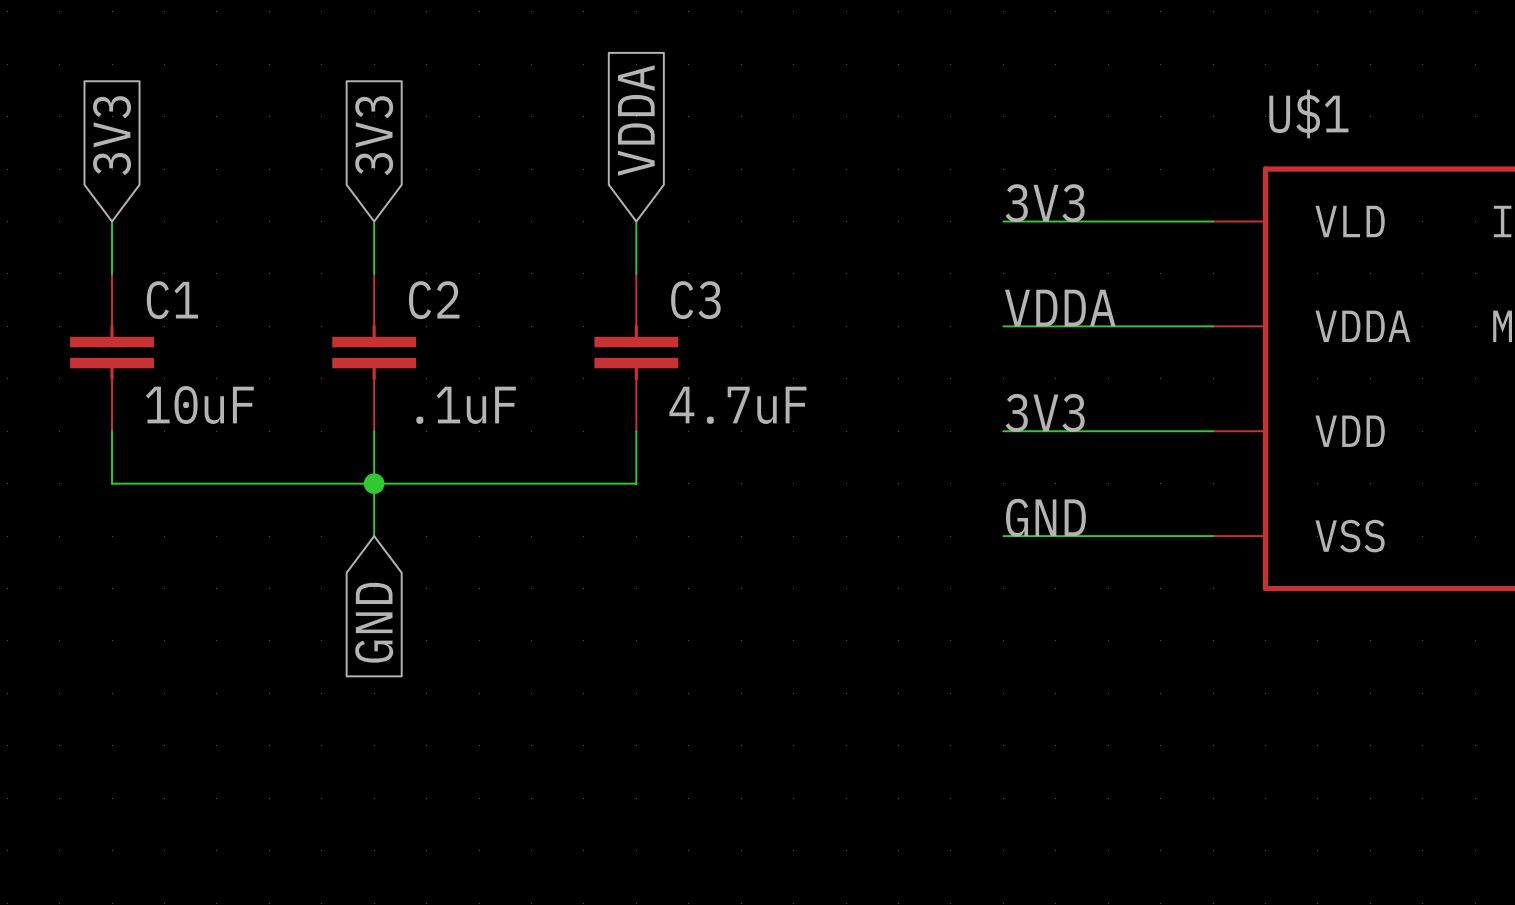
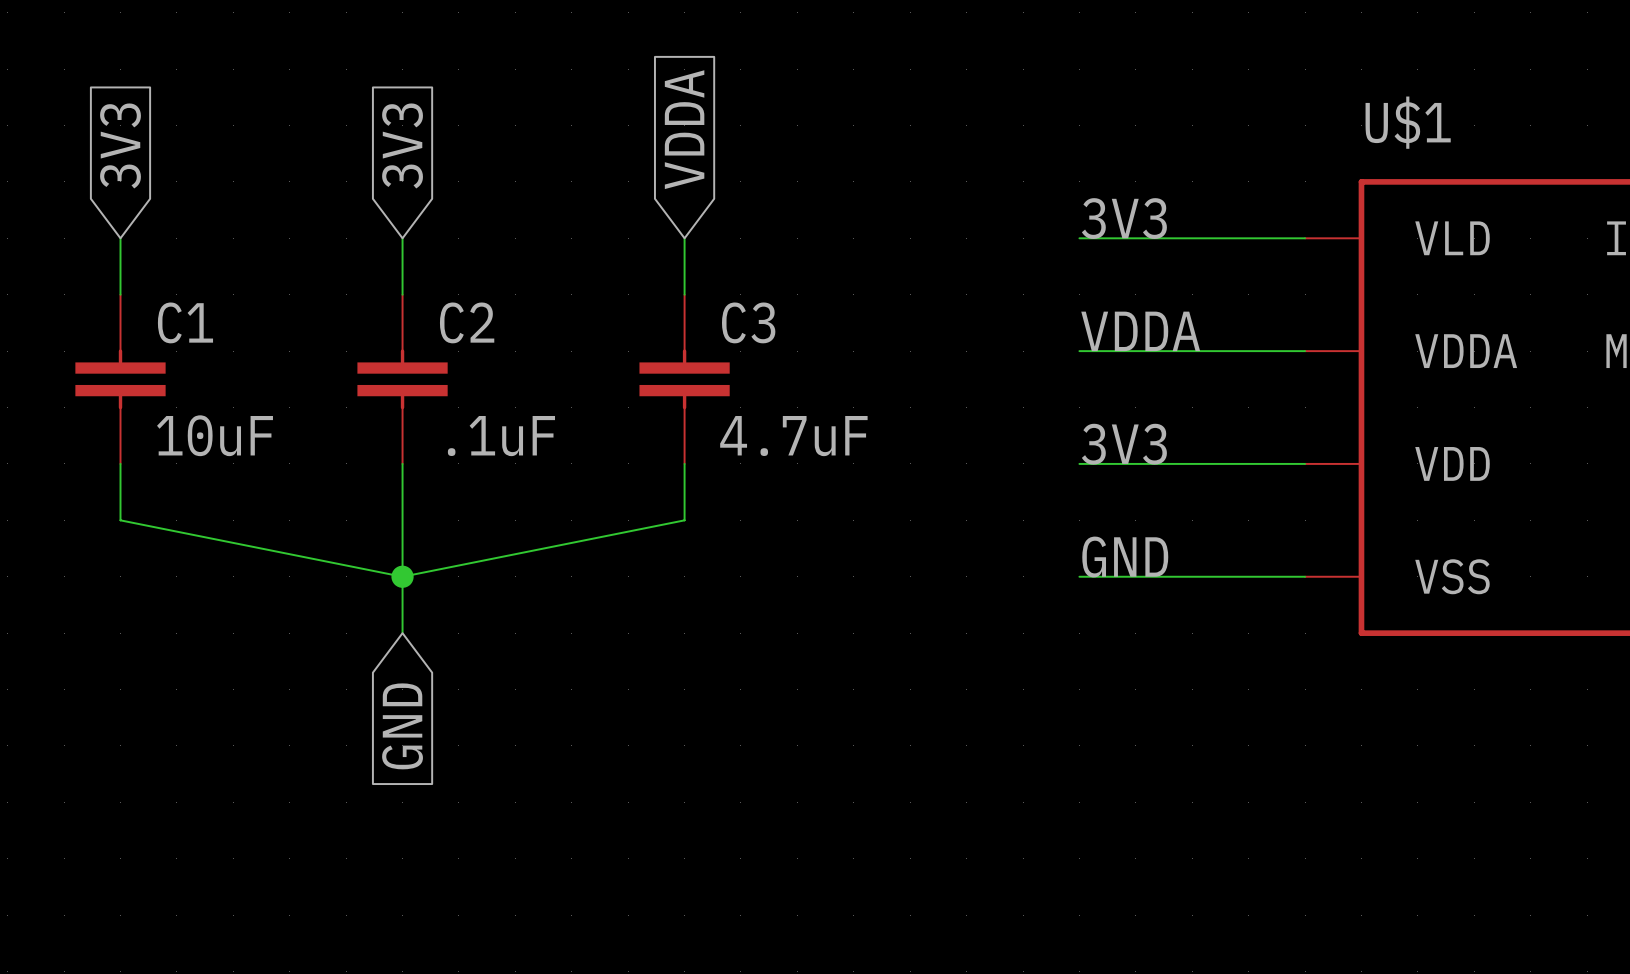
wire: (112, 483) (636, 483) -> (120, 520) (402, 576)
junction position: (374, 483) -> (402, 576)
wire: none -> (684, 520) (402, 576)
wire: none -> (402, 576) (402, 633)
global label position: GND (374, 622) -> GND (402, 726)

